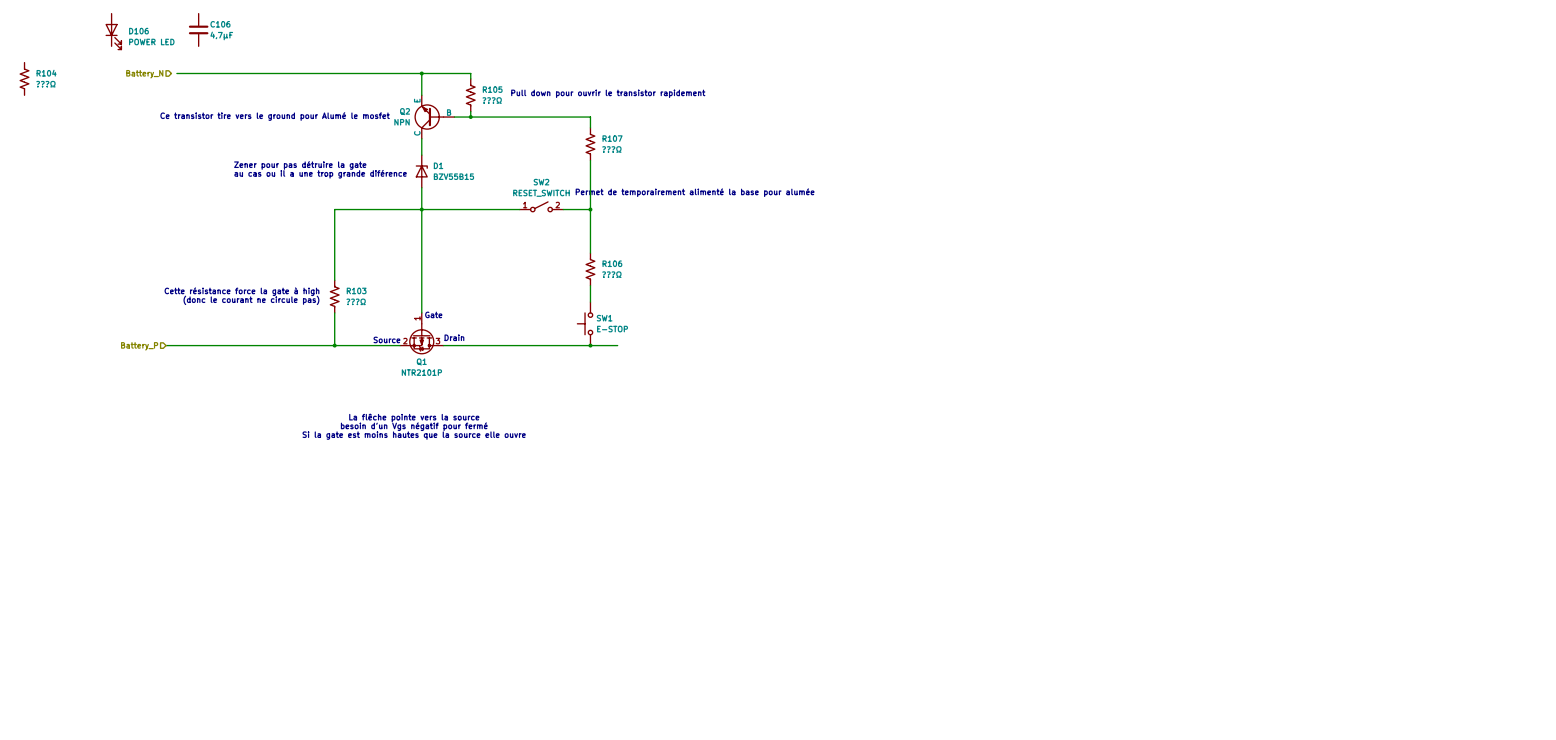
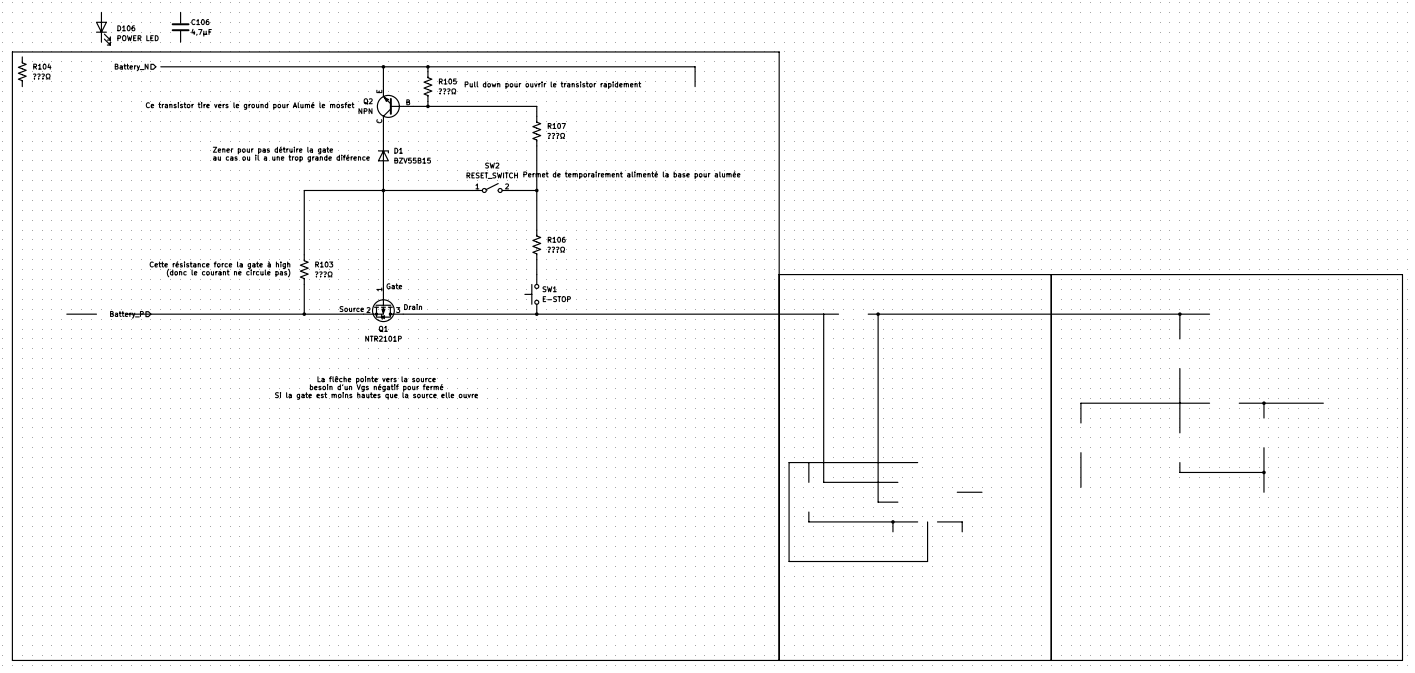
wire: none -> (427, 66) (695, 66) (695, 86)
junction: none -> (427, 66)
line: none -> (779, 274) (1402, 274) (1402, 660) (12, 660) (12, 51) (779, 51) (779, 660)
line: none -> (1051, 274) (1051, 660)
wire: none -> (66, 314) (96, 314)
wire: none -> (126, 314) (150, 314)
wire: none -> (561, 314) (838, 314)
wire: none -> (823, 314) (823, 482) (897, 482)
wire: none -> (868, 314) (1209, 314)
wire: none -> (878, 314) (878, 502) (897, 502)
junction: none -> (878, 314)
wire: none -> (1179, 314) (1179, 338)
junction: none -> (1179, 314)
wire: none -> (1179, 368) (1179, 432)
wire: none -> (1209, 403) (1080, 403) (1080, 422)
wire: none -> (1239, 403) (1323, 403)
wire: none -> (1263, 403) (1263, 418)
junction: none -> (1263, 403)
wire: none -> (1263, 447) (1263, 492)
wire: none -> (1080, 452) (1080, 487)
wire: none -> (808, 462) (808, 482)
wire: none -> (917, 462) (789, 462) (789, 561) (927, 561) (927, 521)
wire: none -> (1179, 462) (1179, 472) (1263, 472)
junction: none -> (1263, 472)
wire: none -> (957, 492) (982, 492)
wire: none -> (808, 512) (808, 521) (917, 521)
wire: none -> (892, 521) (892, 531)
junction: none -> (892, 521)
wire: none -> (937, 521) (962, 521) (962, 531)

